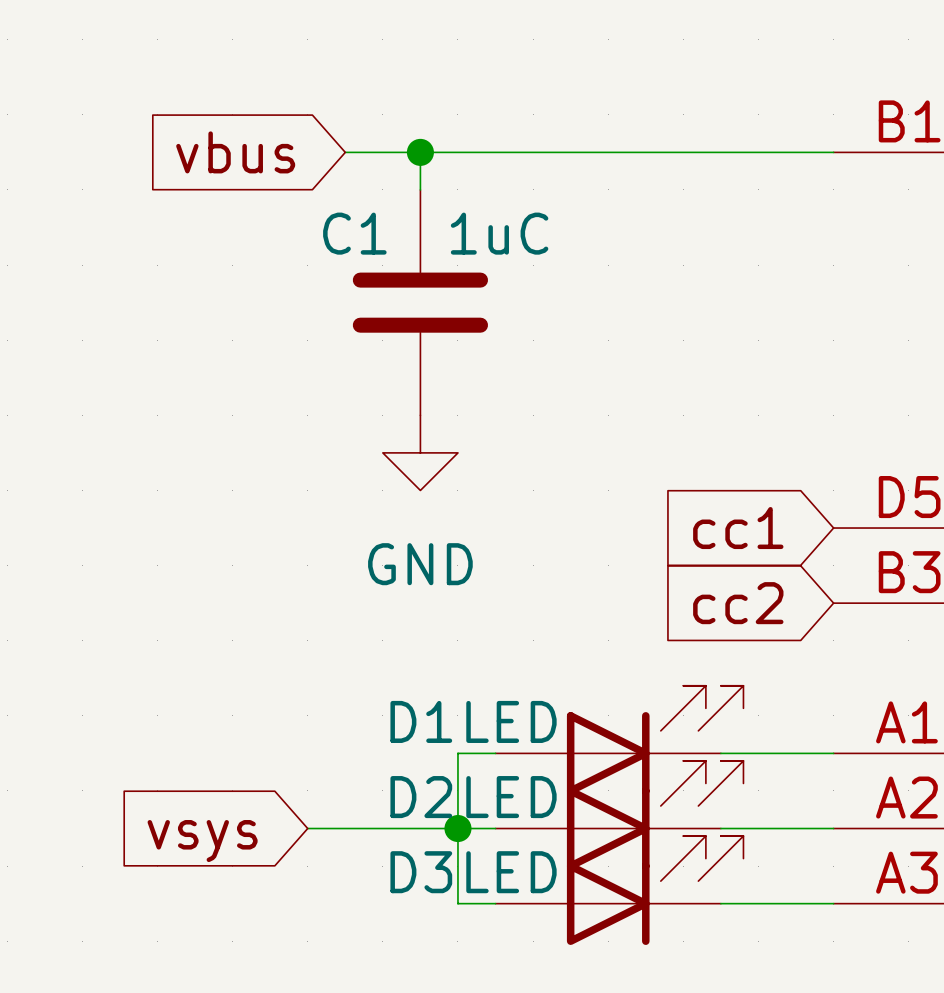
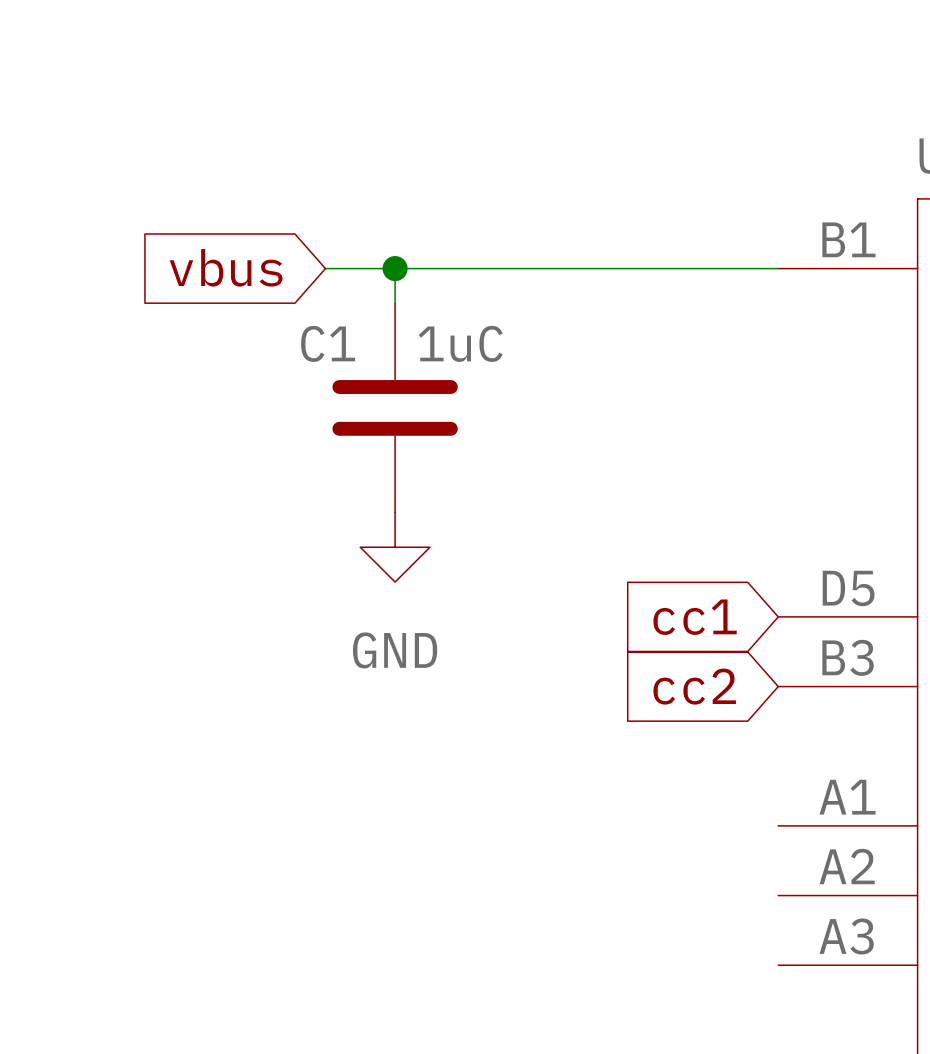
D1: LED (619, 740) -> none
wire: (495, 753) (457, 753) (457, 903) (495, 903) -> none
wire: (720, 753) (833, 753) -> none
D2: LED (619, 815) -> none
wire: (307, 828) (495, 828) -> none
junction: (457, 828) -> none
wire: (720, 828) (833, 828) -> none
global label: vsys (202, 841) -> none
D3: LED (619, 890) -> none
wire: (720, 903) (833, 903) -> none

